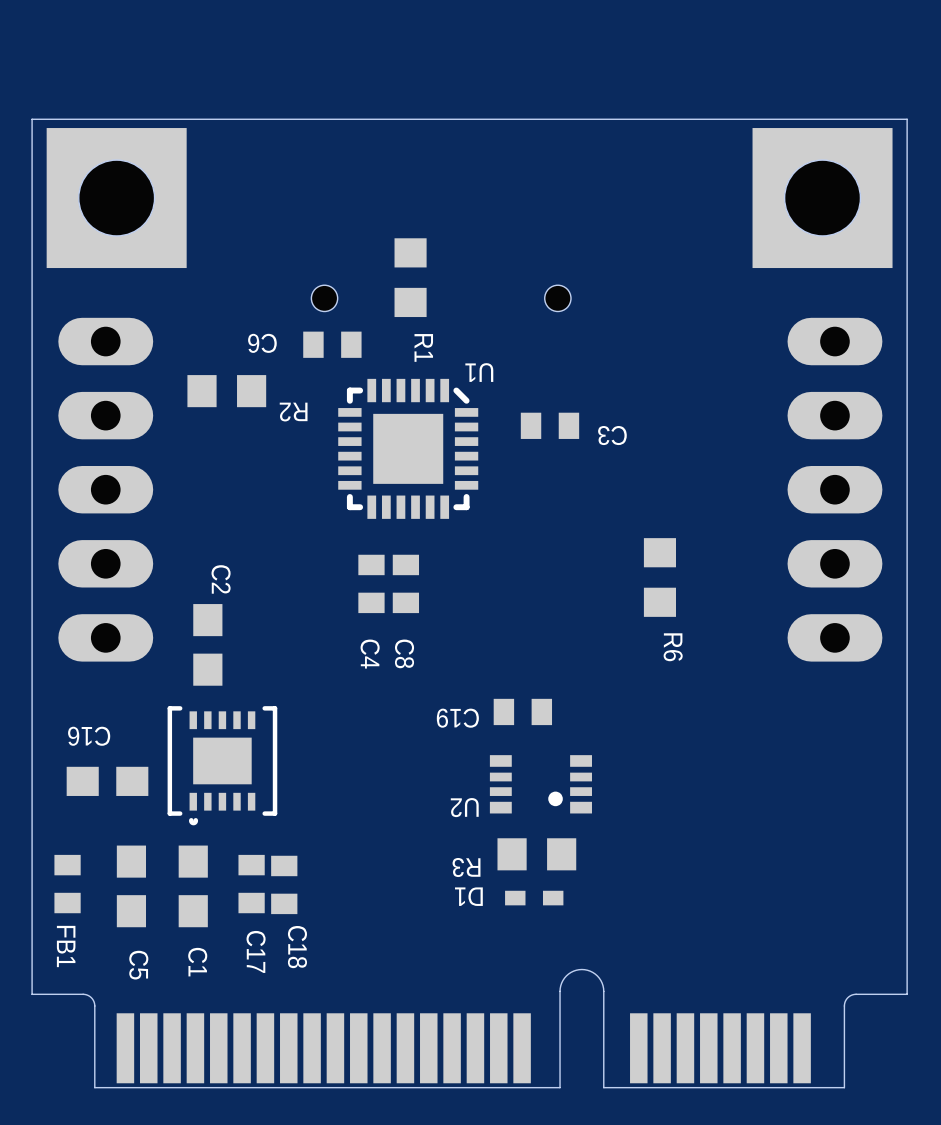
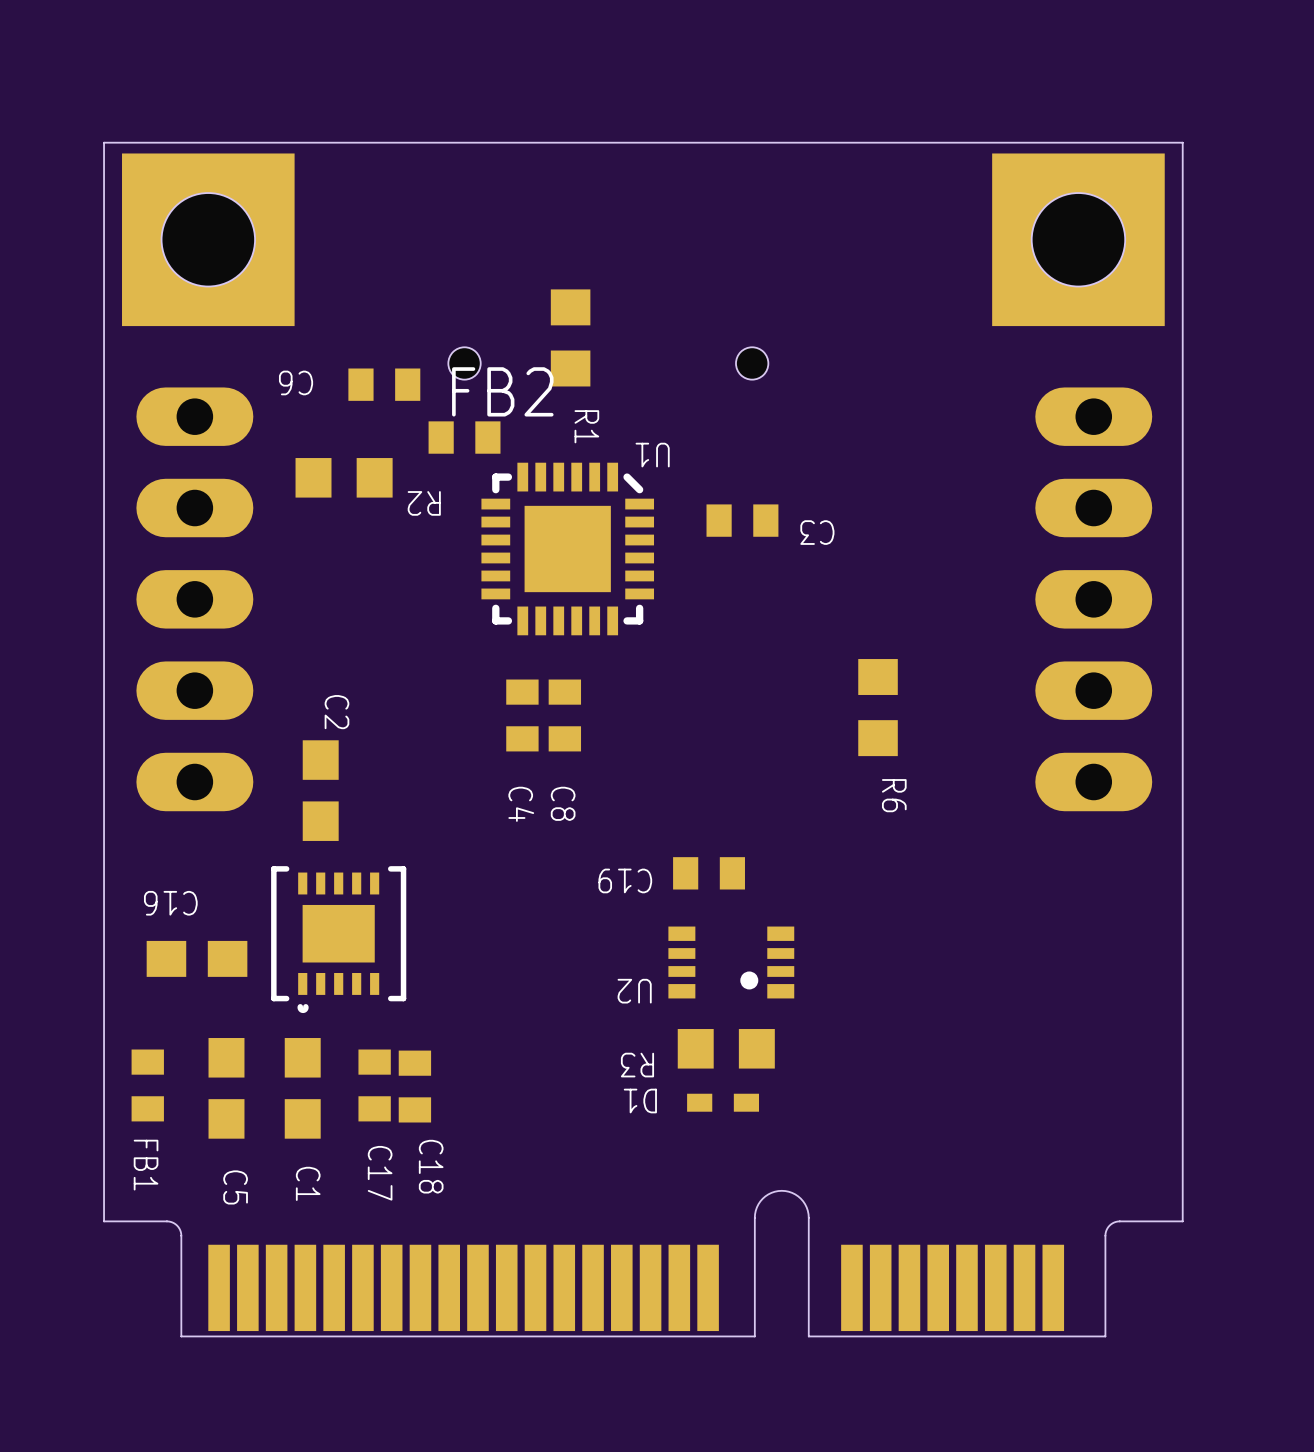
C6 position: (332, 344) -> (384, 384)
FB2: none -> (464, 437)

